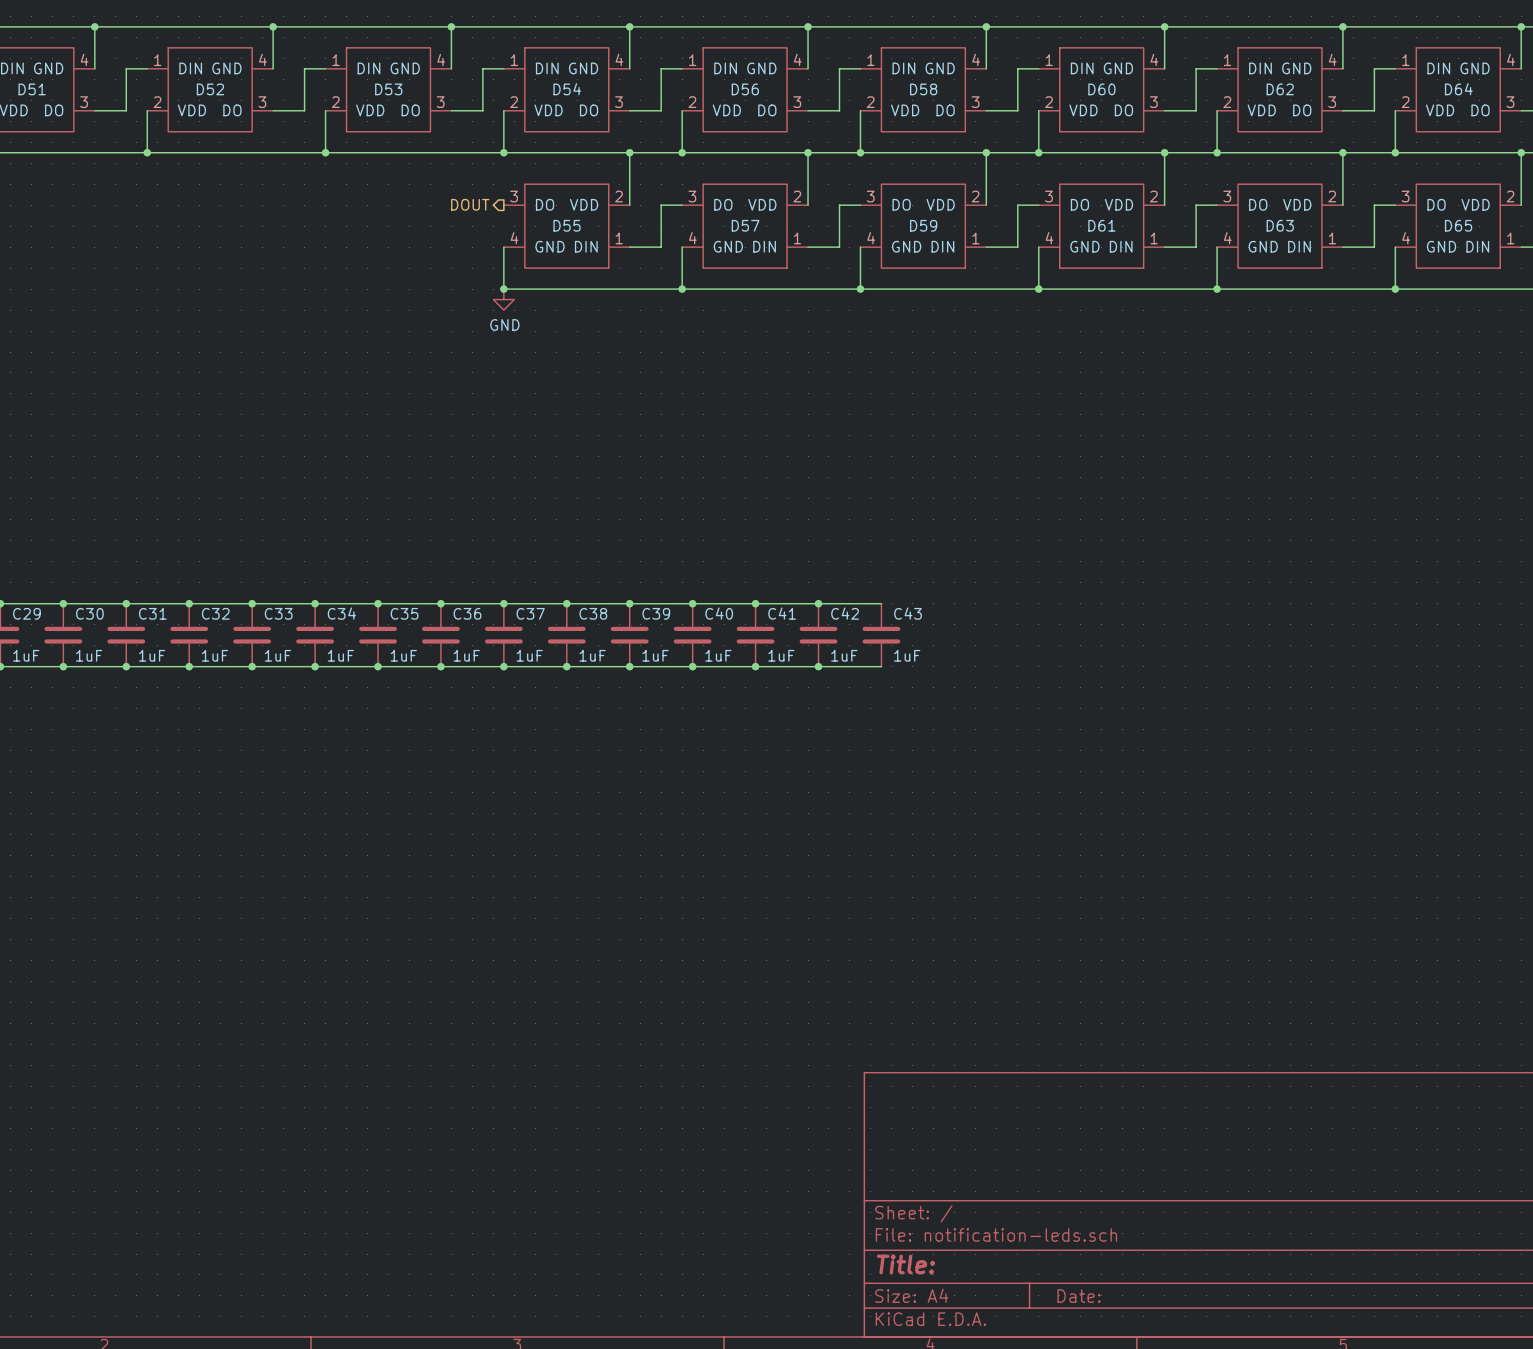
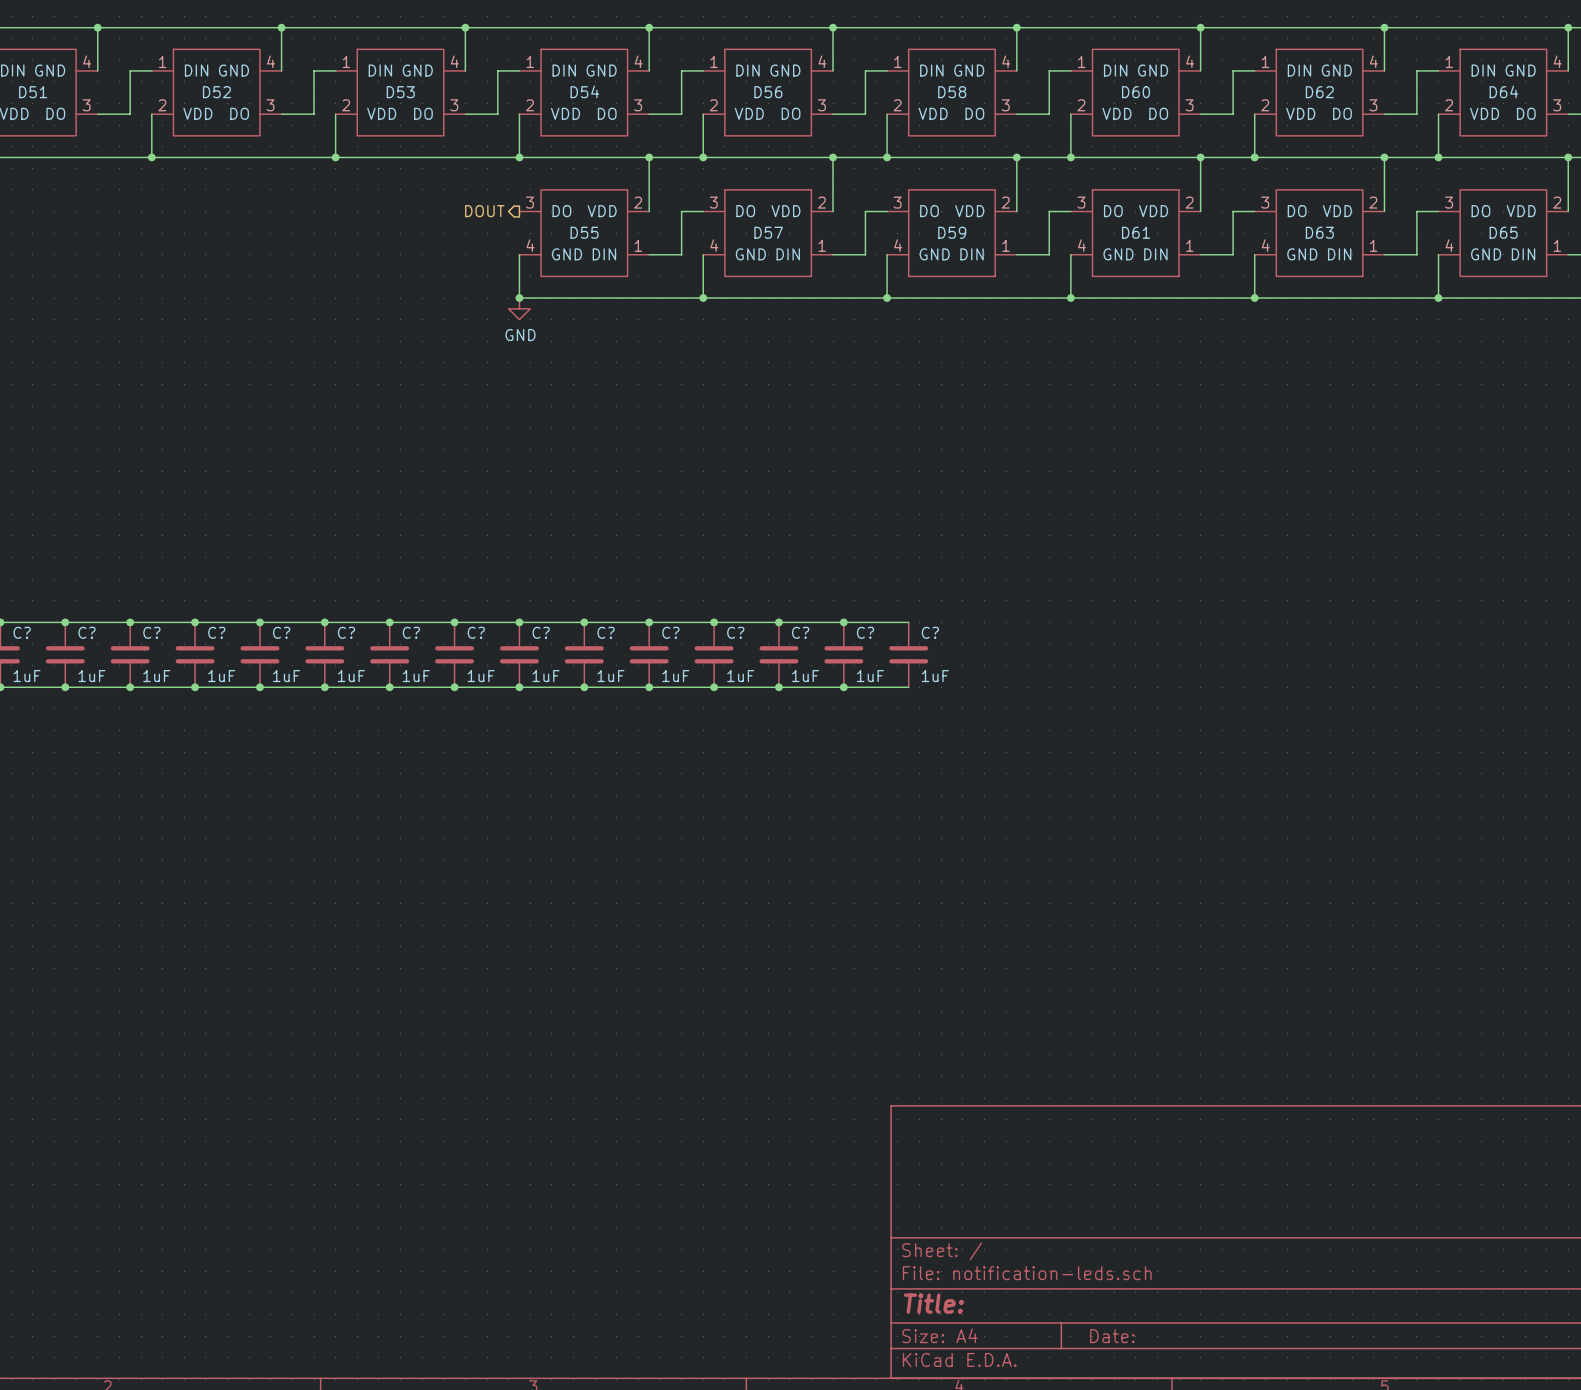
C29 name: C29 (26, 613) -> C? (22, 632)
C30 name: C30 (89, 613) -> C? (87, 632)
C31 name: C31 (152, 613) -> C? (151, 632)
C32 name: C32 (215, 613) -> C? (216, 632)
C33 name: C33 (278, 613) -> C? (281, 632)
C34 name: C34 (341, 613) -> C? (346, 632)
C35 name: C35 (404, 613) -> C? (411, 632)
C36 name: C36 (467, 613) -> C? (476, 632)
C37 name: C37 (530, 613) -> C? (541, 632)
C38 name: C38 (593, 613) -> C? (606, 632)
C39 name: C39 (656, 613) -> C? (670, 632)
C40 name: C40 (719, 613) -> C? (735, 632)
C41 name: C41 (782, 613) -> C? (800, 632)
C42 name: C42 (845, 613) -> C? (865, 632)
C43 name: C43 (907, 613) -> C? (930, 632)

